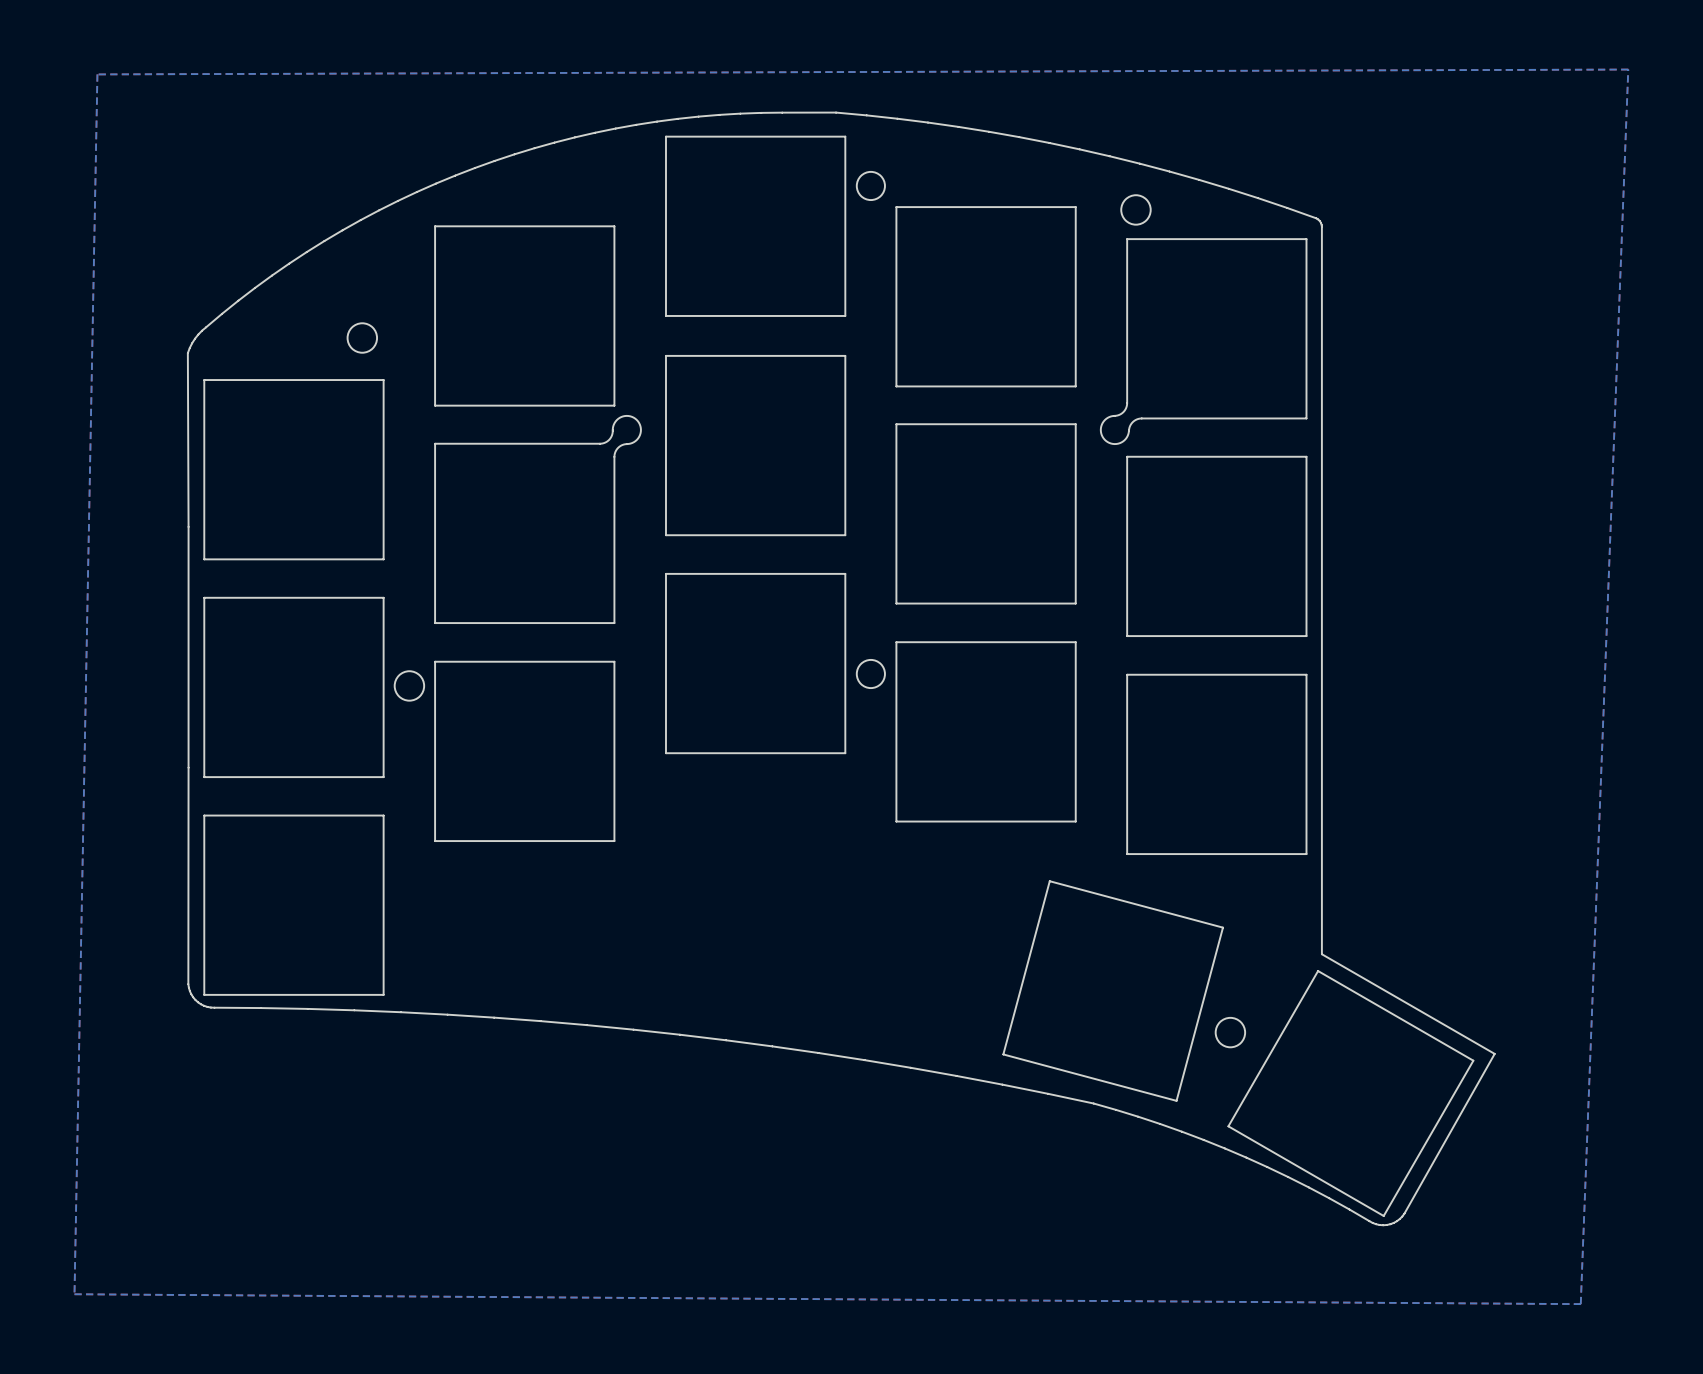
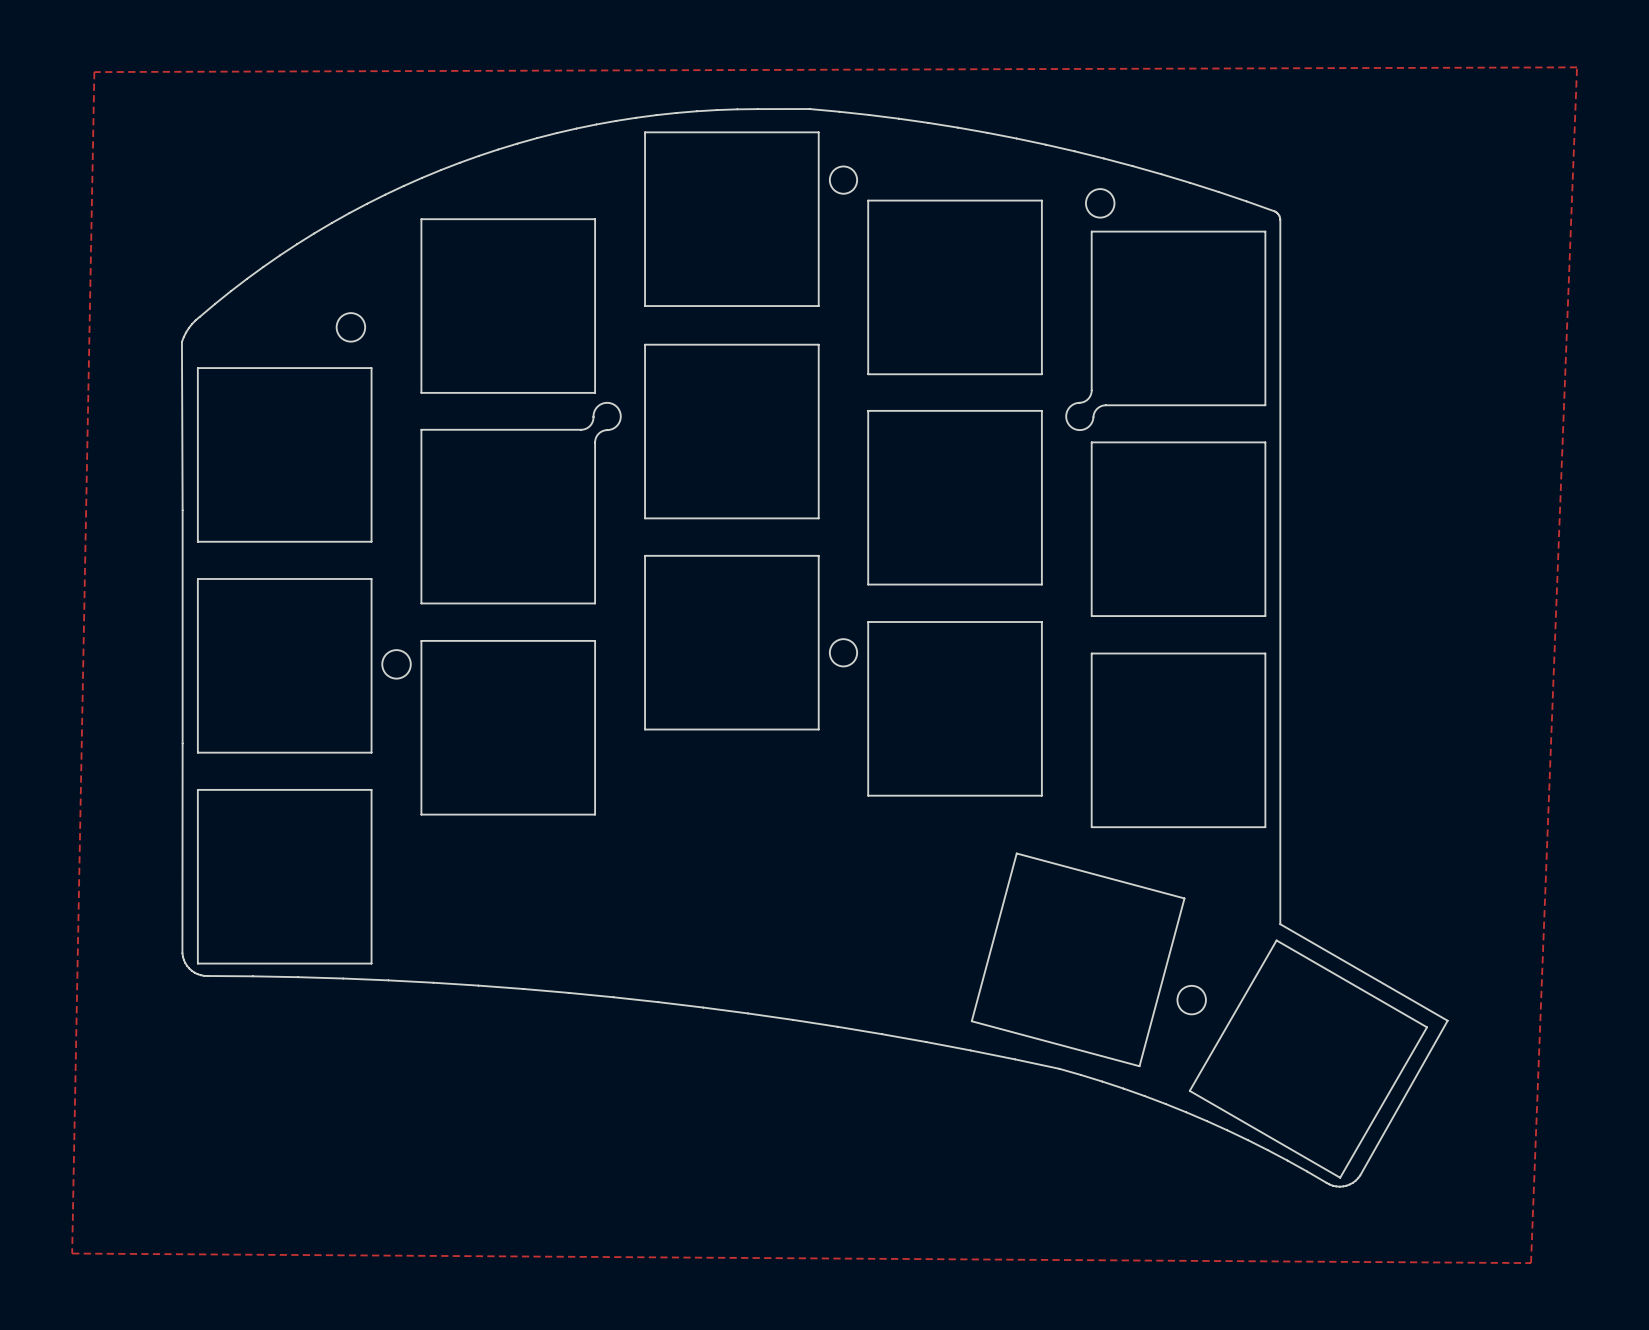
bottom zone outline: (1628, 69) (97, 74) (74, 1294) (1580, 1304) (1628, 69) -> none

